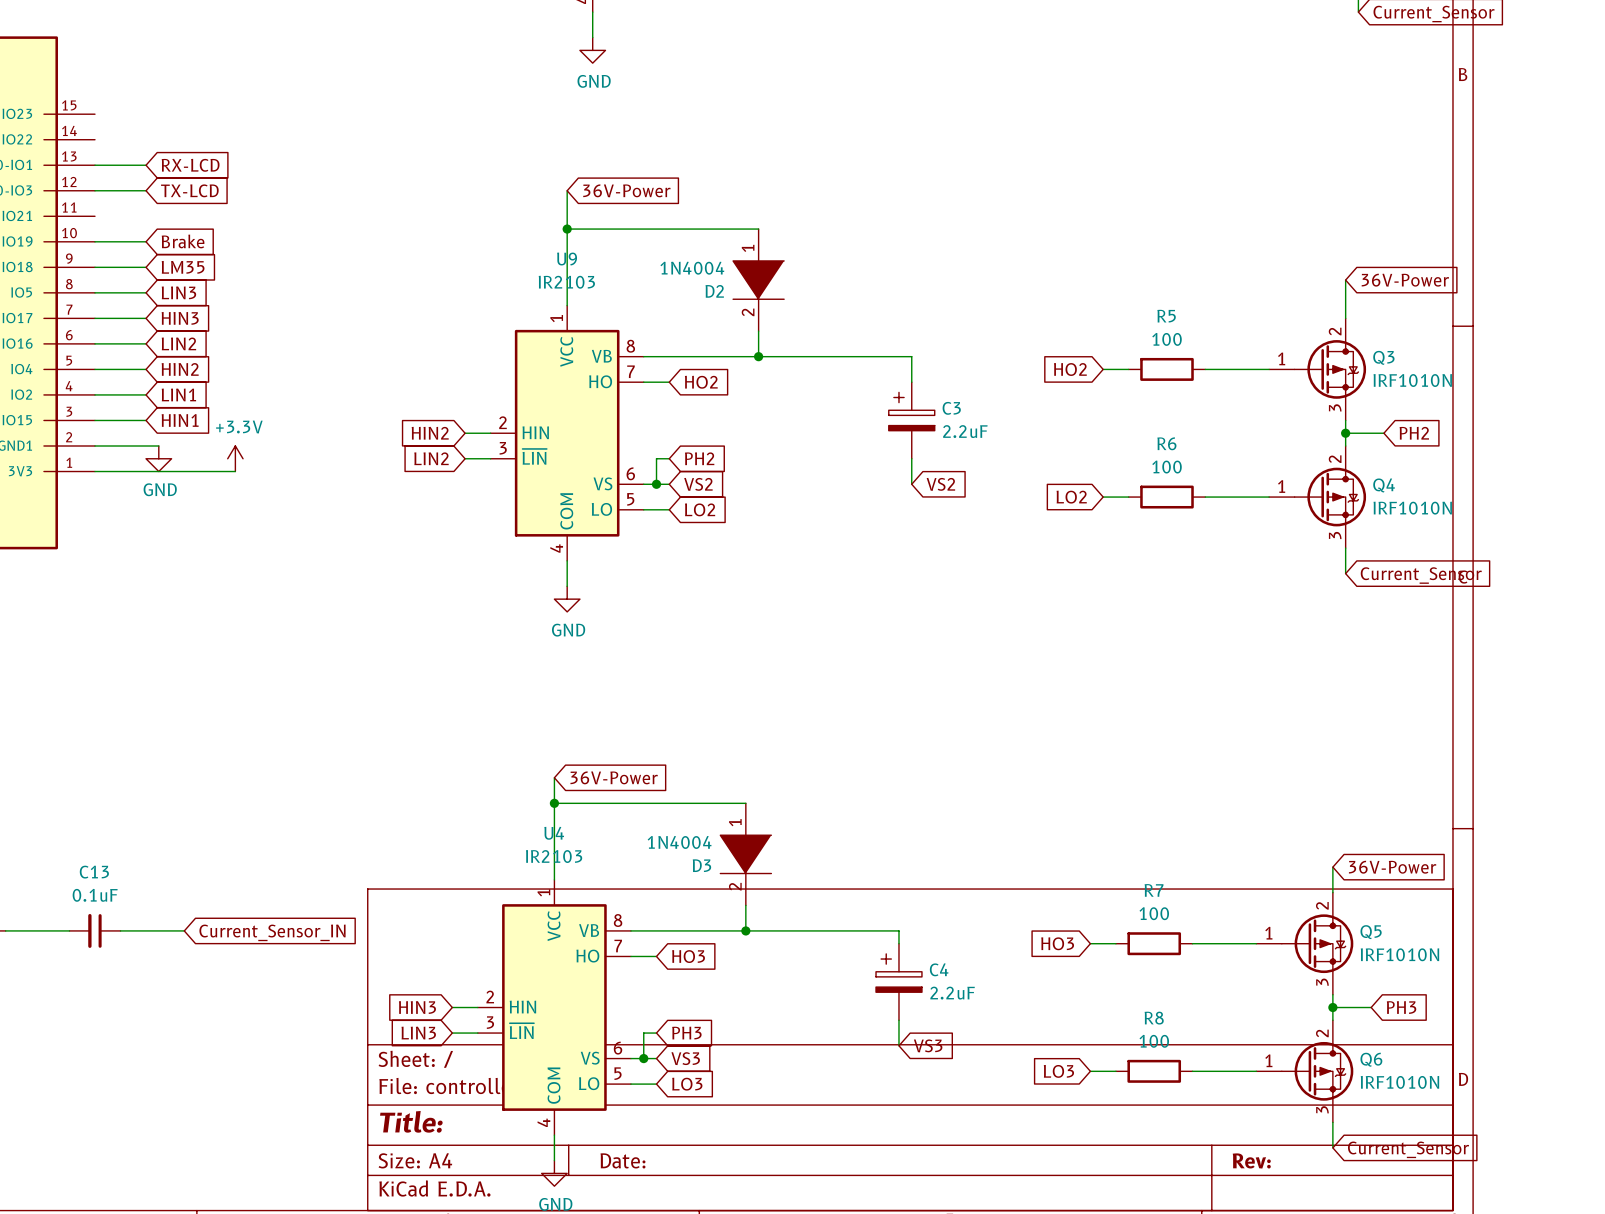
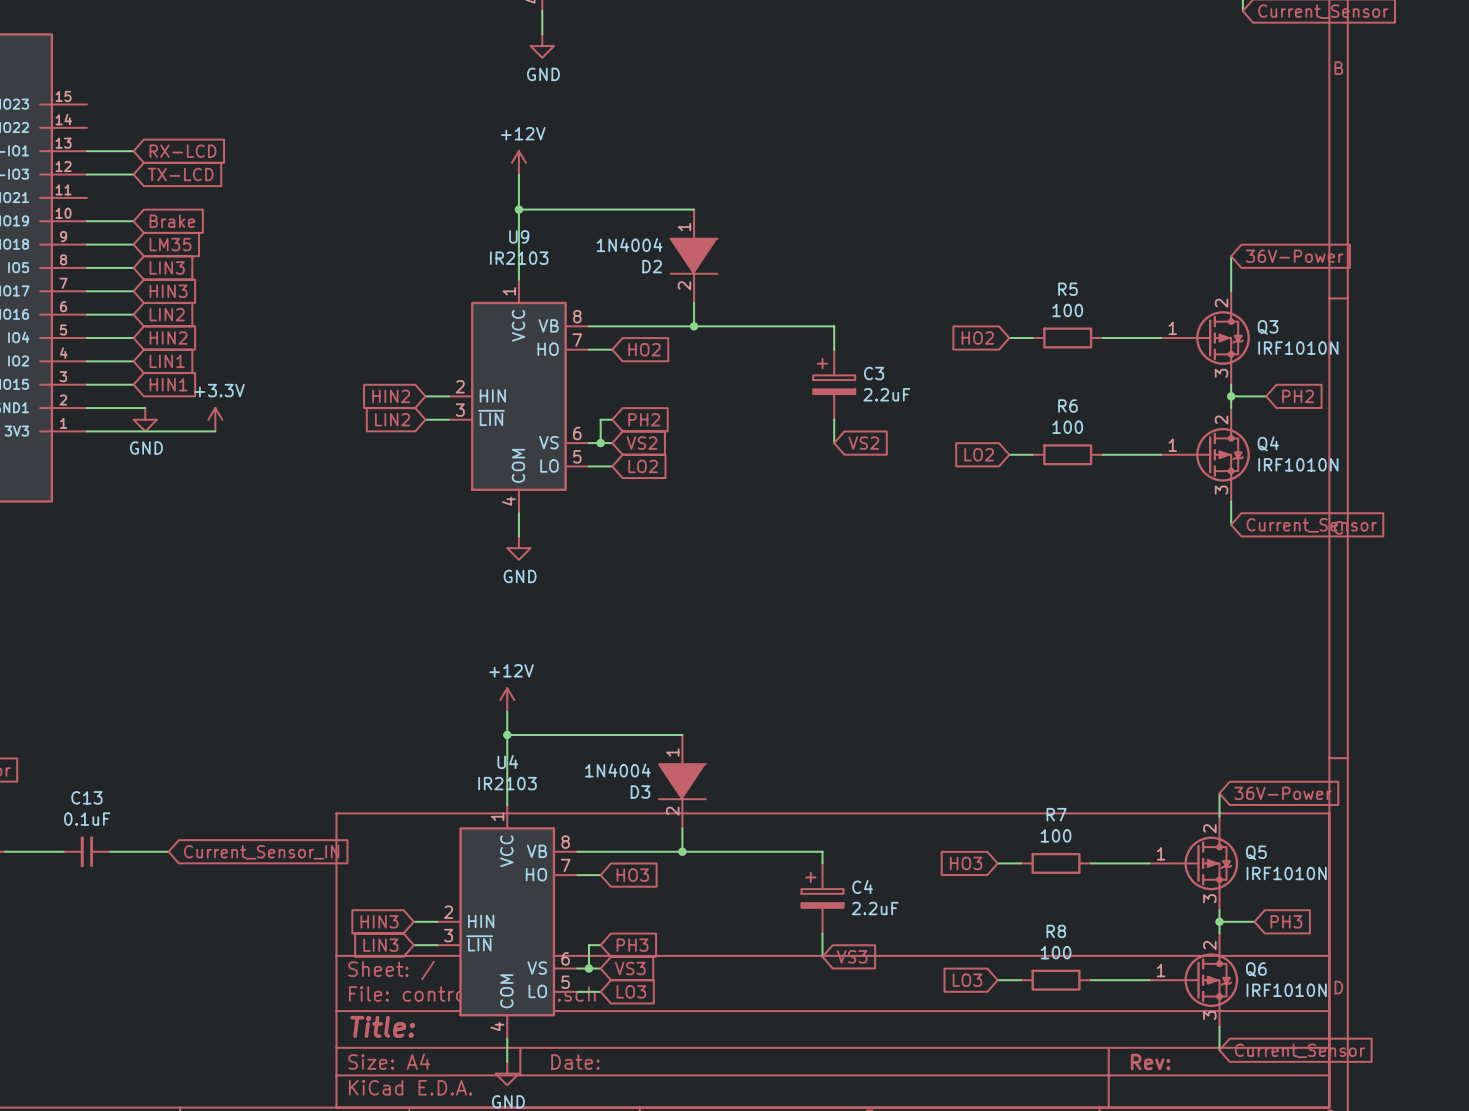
power symbol: none -> +12V (518, 162)
global label: 36V-Power (626, 190) -> none
power symbol: none -> +12V (507, 699)
global label: 36V-Power (614, 777) -> none

